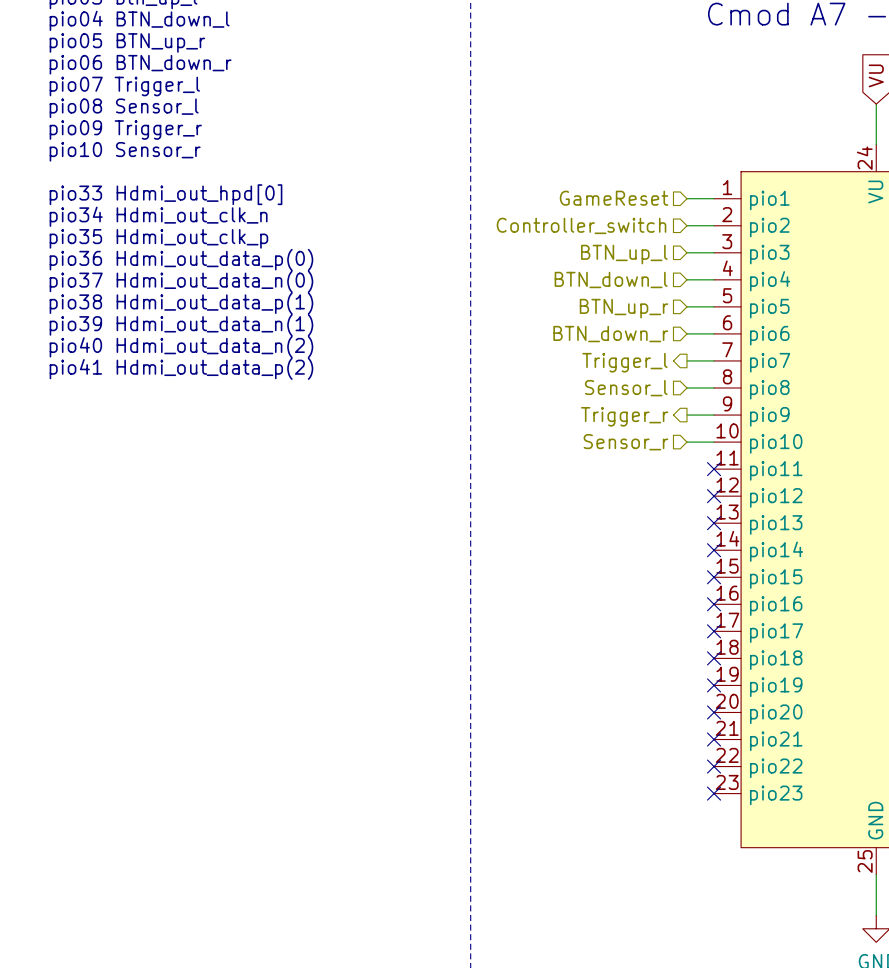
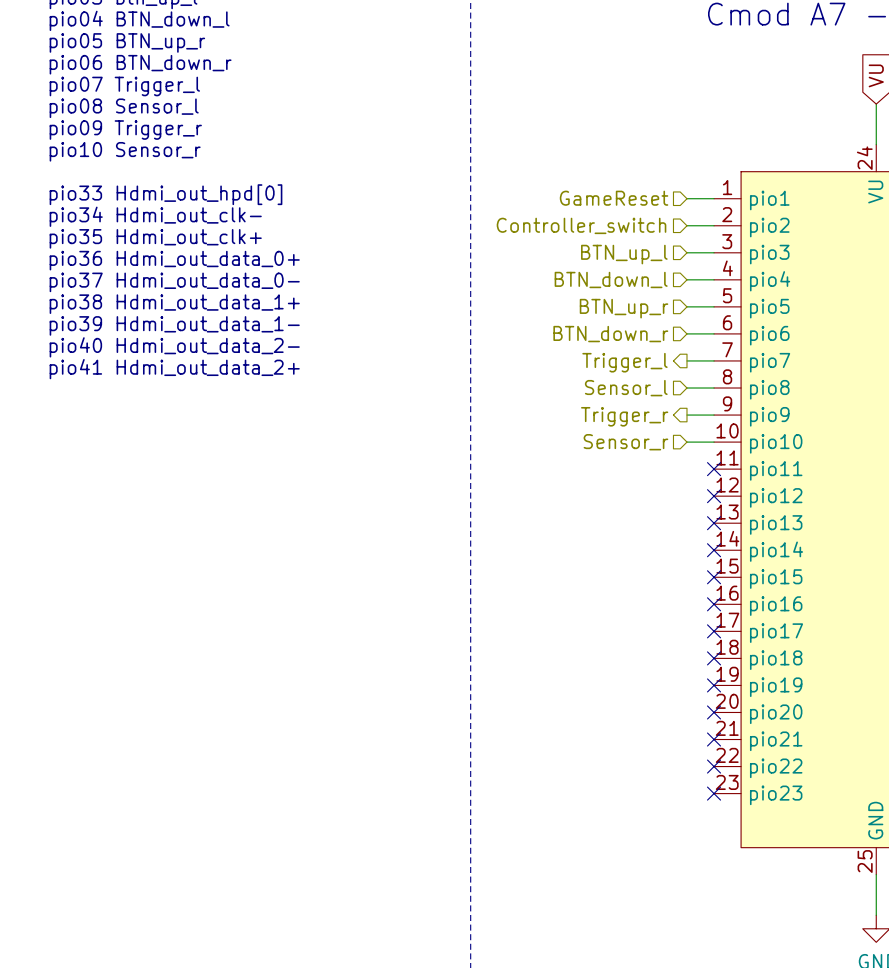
text: pio34 Hdmi_out_clk_n (158, 216) -> pio34 Hdmi_out_clk- (155, 216)
text: pio35 Hdmi_out_clk_p (158, 238) -> pio35 Hdmi_out_clk+ (155, 238)
text: pio36 Hdmi_out_data_p(0) (181, 259) -> pio36 Hdmi_out_data_0+ (174, 260)
text: pio37 Hdmi_out_data_n(0) (181, 281) -> pio37 Hdmi_out_data_0- (174, 282)
text: pio38 Hdmi_out_data_p(1) (181, 303) -> pio38 Hdmi_out_data_1+ (174, 304)
text: pio39 Hdmi_out_data_n(1) (181, 325) -> pio39 Hdmi_out_data_1- (174, 325)
text: pio40 Hdmi_out_data_n(2) (181, 347) -> pio40 Hdmi_out_data_2- (174, 347)
text: pio41 Hdmi_out_data_p(2) (181, 368) -> pio41 Hdmi_out_data_2+ (174, 369)

